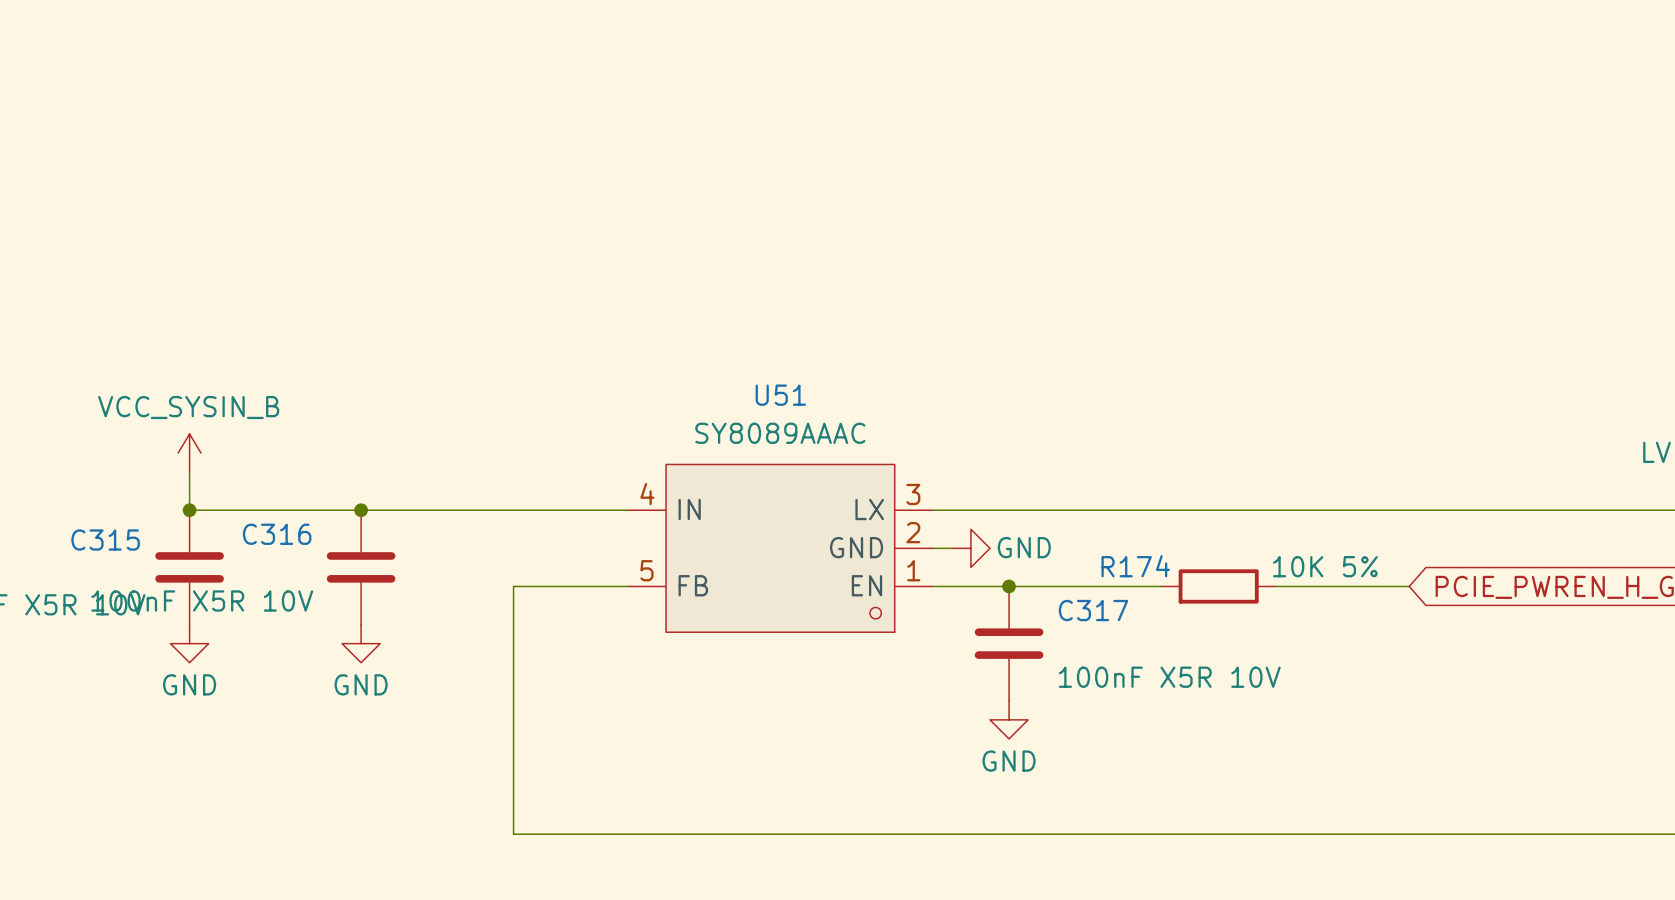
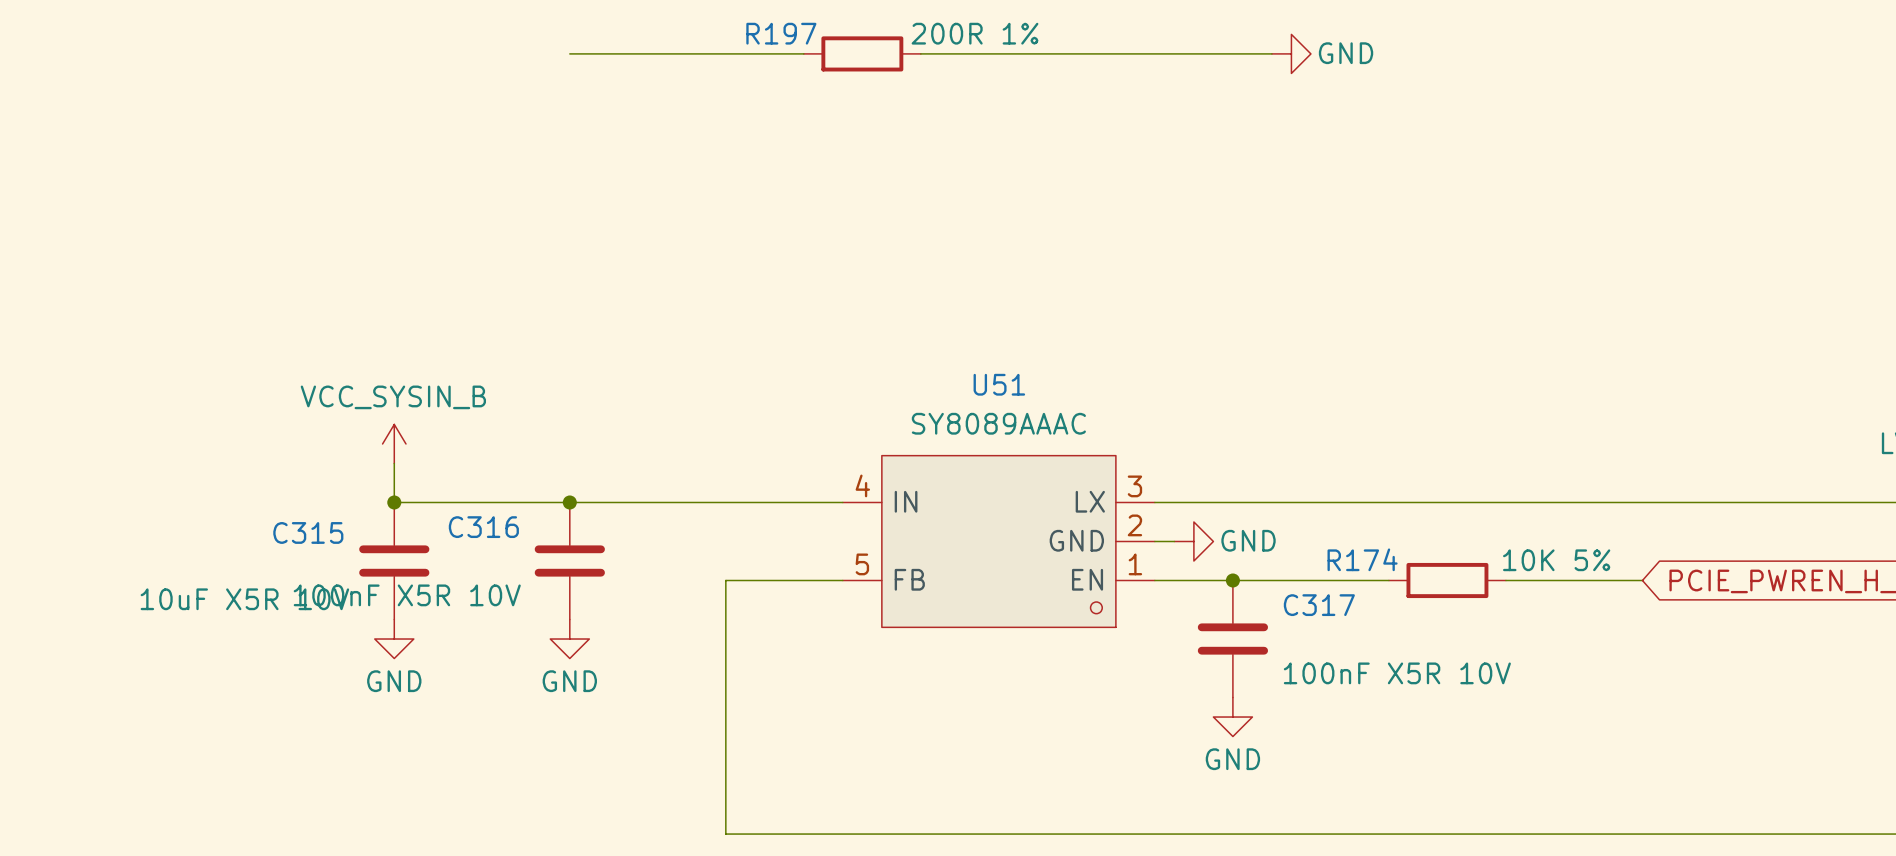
wire: none -> (569, 53) (803, 53)
R197: none -> 200R 1% (862, 53)
wire: none -> (920, 53) (1271, 53)
power symbol: none -> GND (1291, 53)

